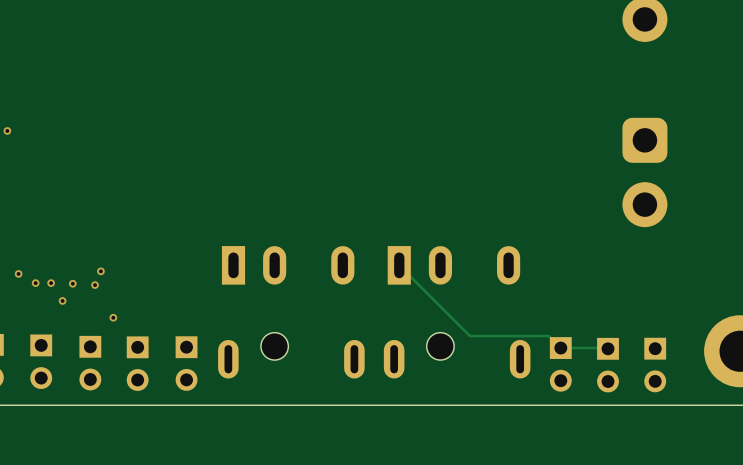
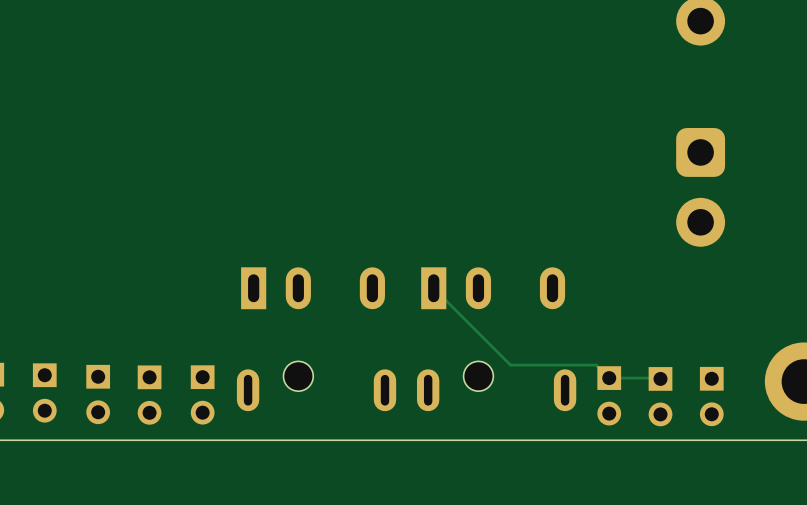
via: (7, 130) -> none
via: (100, 271) -> none
via: (18, 273) -> none
via: (35, 283) -> none
via: (51, 283) -> none
via: (72, 283) -> none
via: (95, 285) -> none
via: (62, 300) -> none
via: (113, 317) -> none

